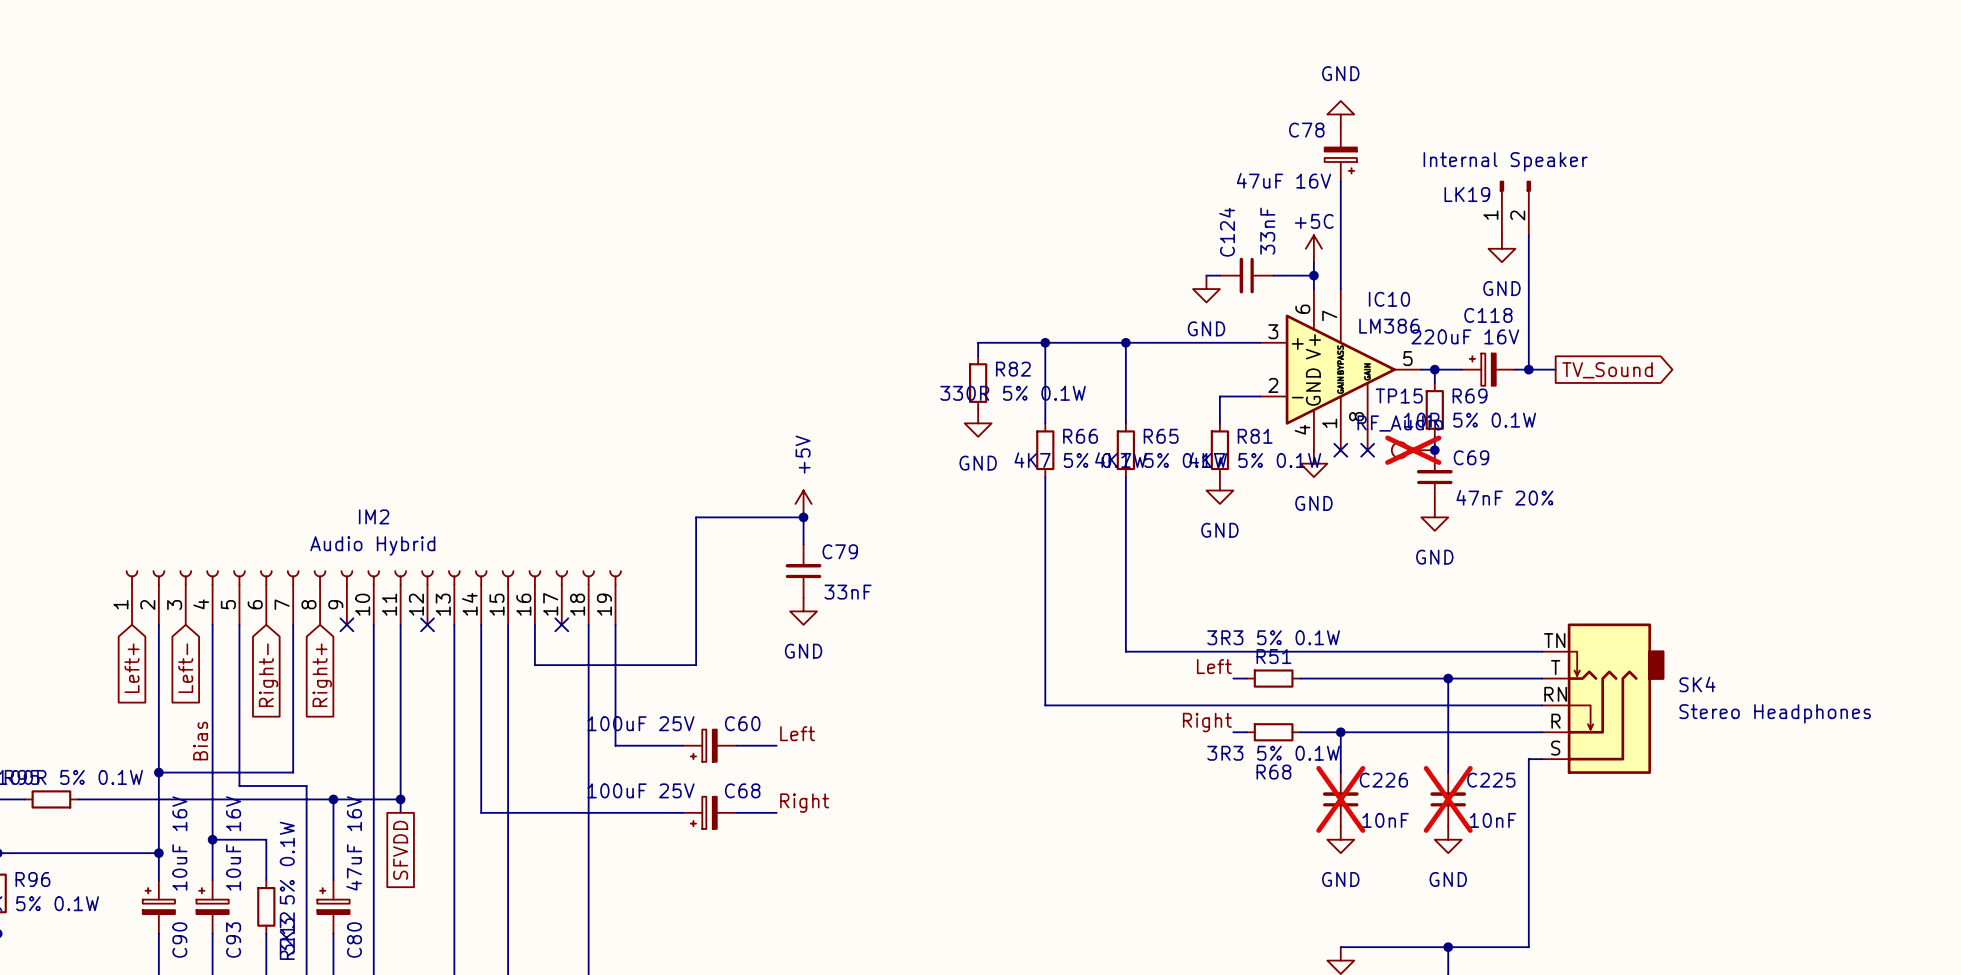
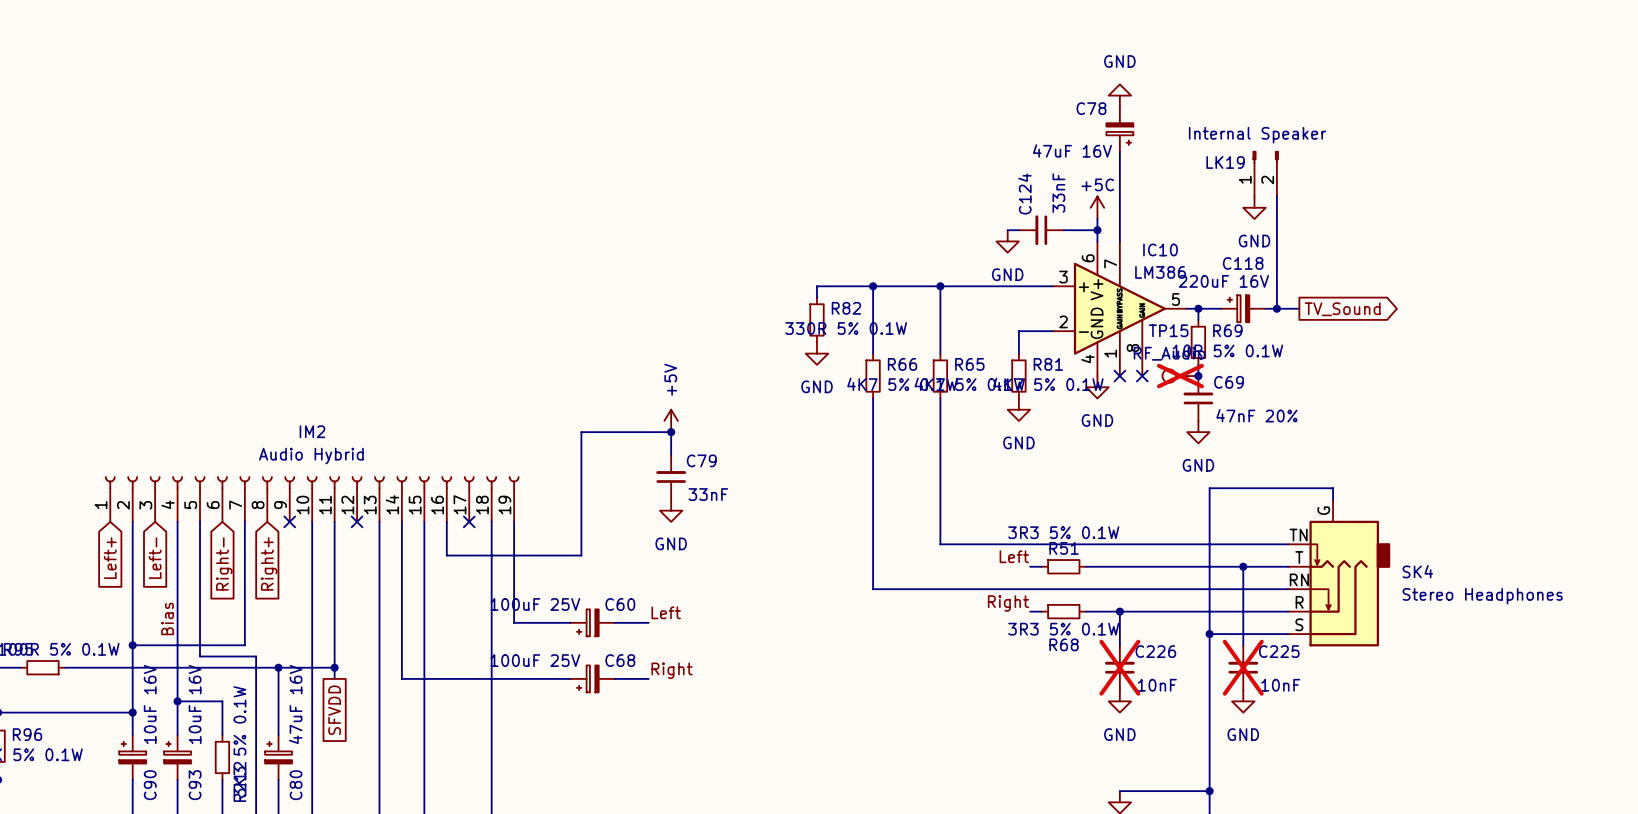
wire: none -> (1333, 499) (1333, 488) (1209, 488) (1209, 566)
SK4 symbol: [1542, 623, 1665, 774] -> [1288, 499, 1391, 647]
junction: (1448, 678) -> none
wire: none -> (1243, 566) (1243, 645)
junction: none -> (1243, 566)
wire: none -> (1209, 634) (1276, 634)
junction: none -> (1209, 634)
wire: (1528, 759) (1528, 947) (1448, 947) -> (1209, 645) (1209, 791)
C225 position: (1448, 799) -> (1243, 667)
power symbol position: GND (1448, 839) -> GND (1243, 701)

